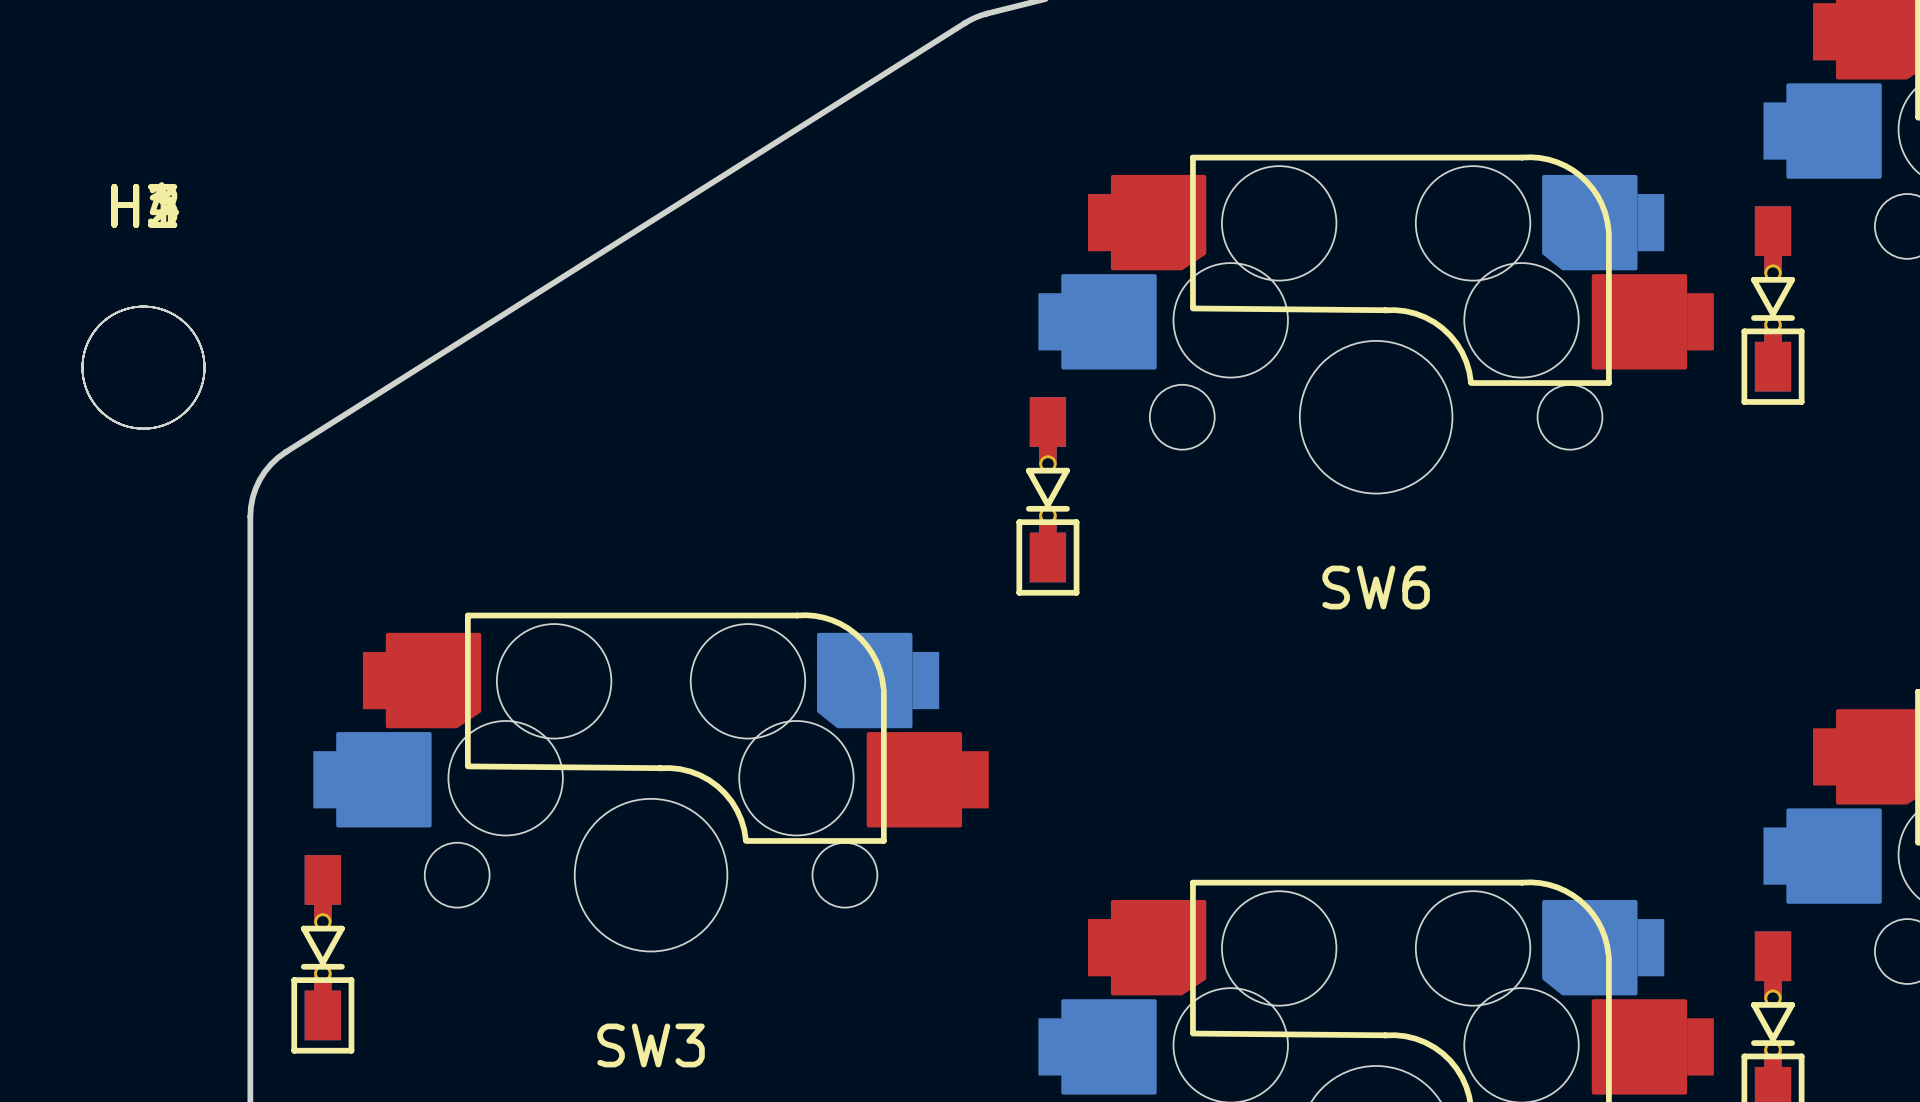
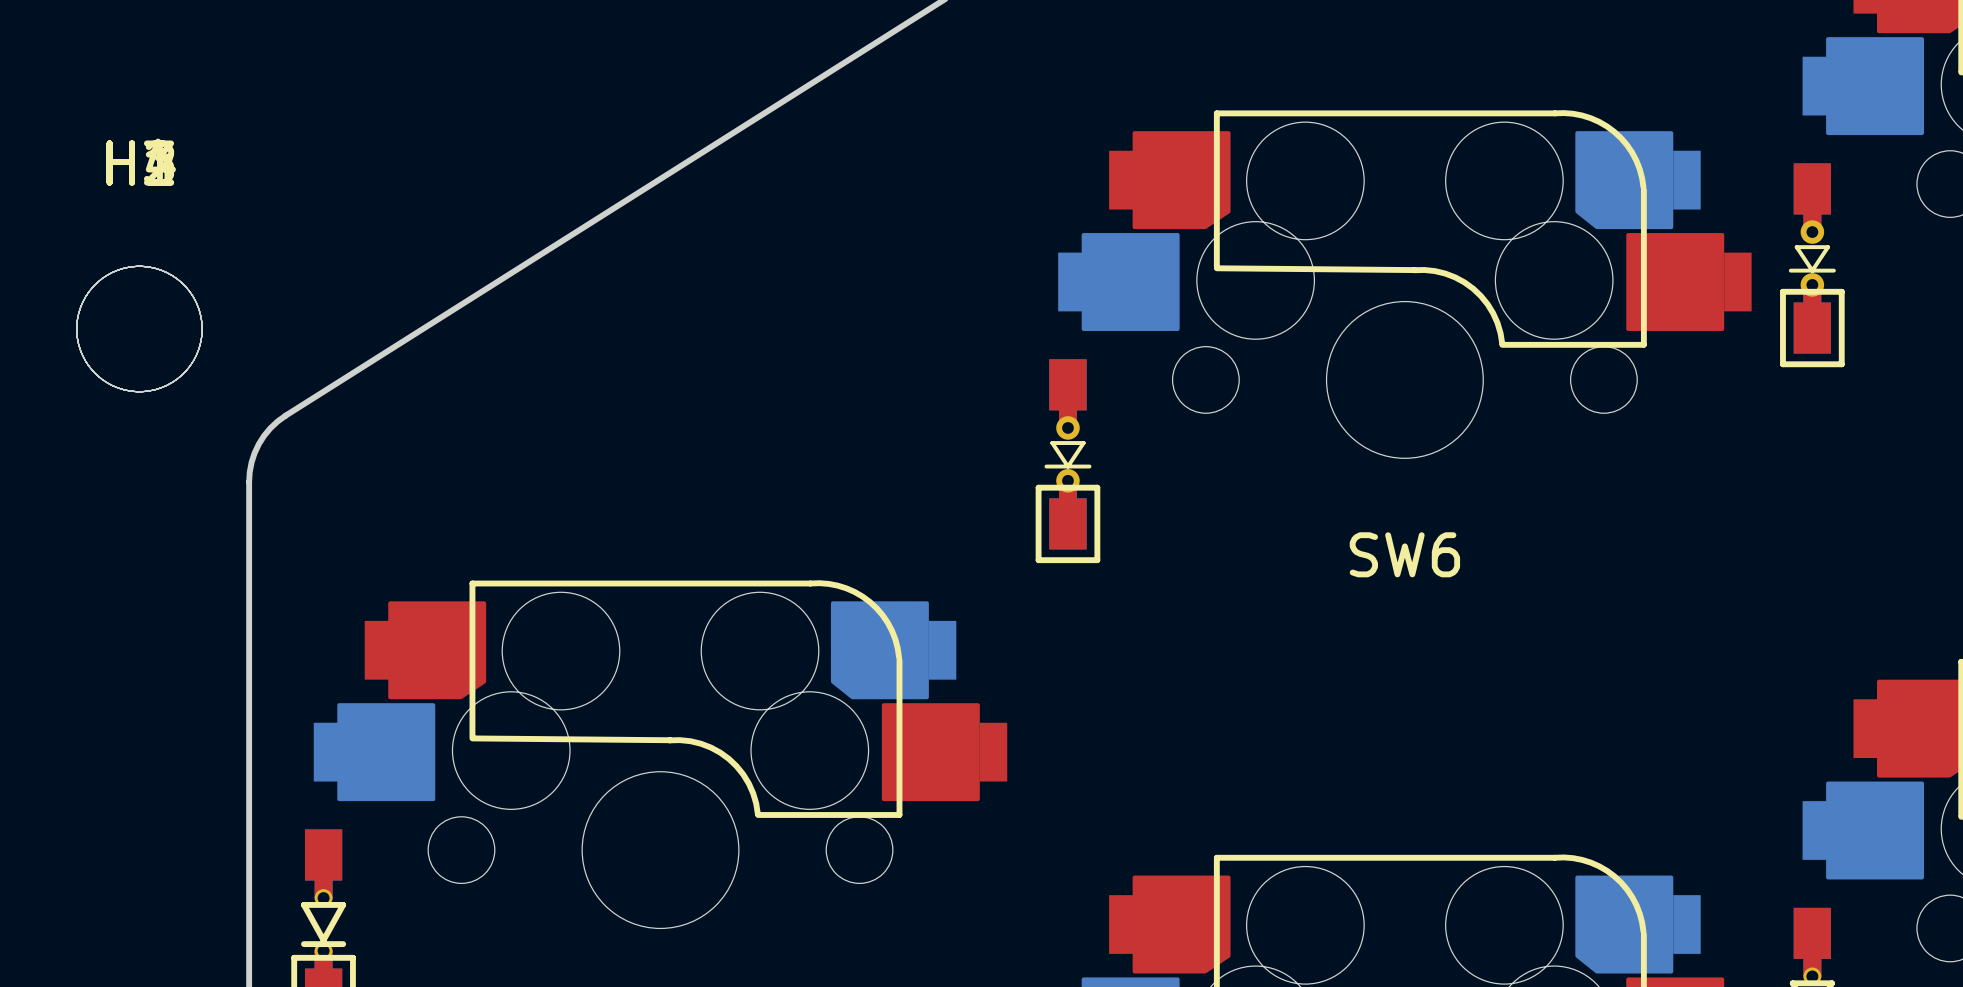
part footprint: [1741, 206, 1805, 405] -> [1780, 163, 1845, 368]
part footprint: [1016, 397, 1080, 596] -> [1035, 359, 1101, 564]

